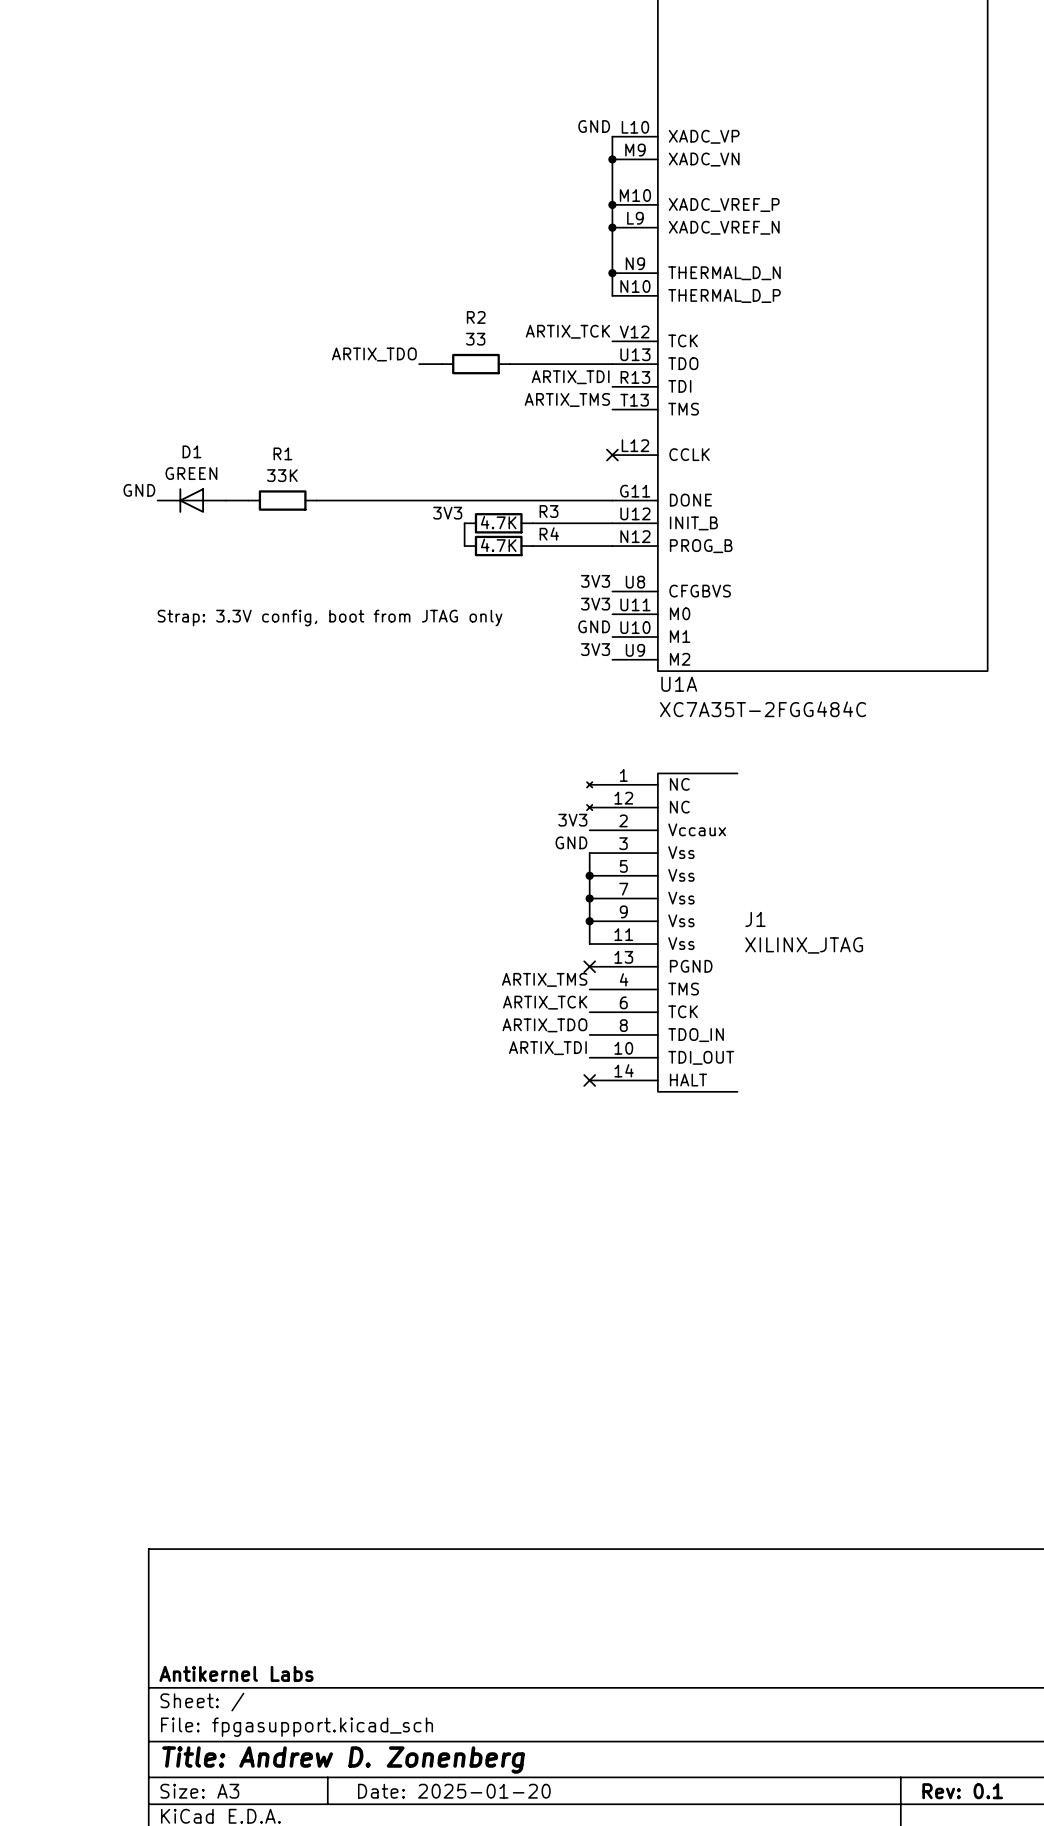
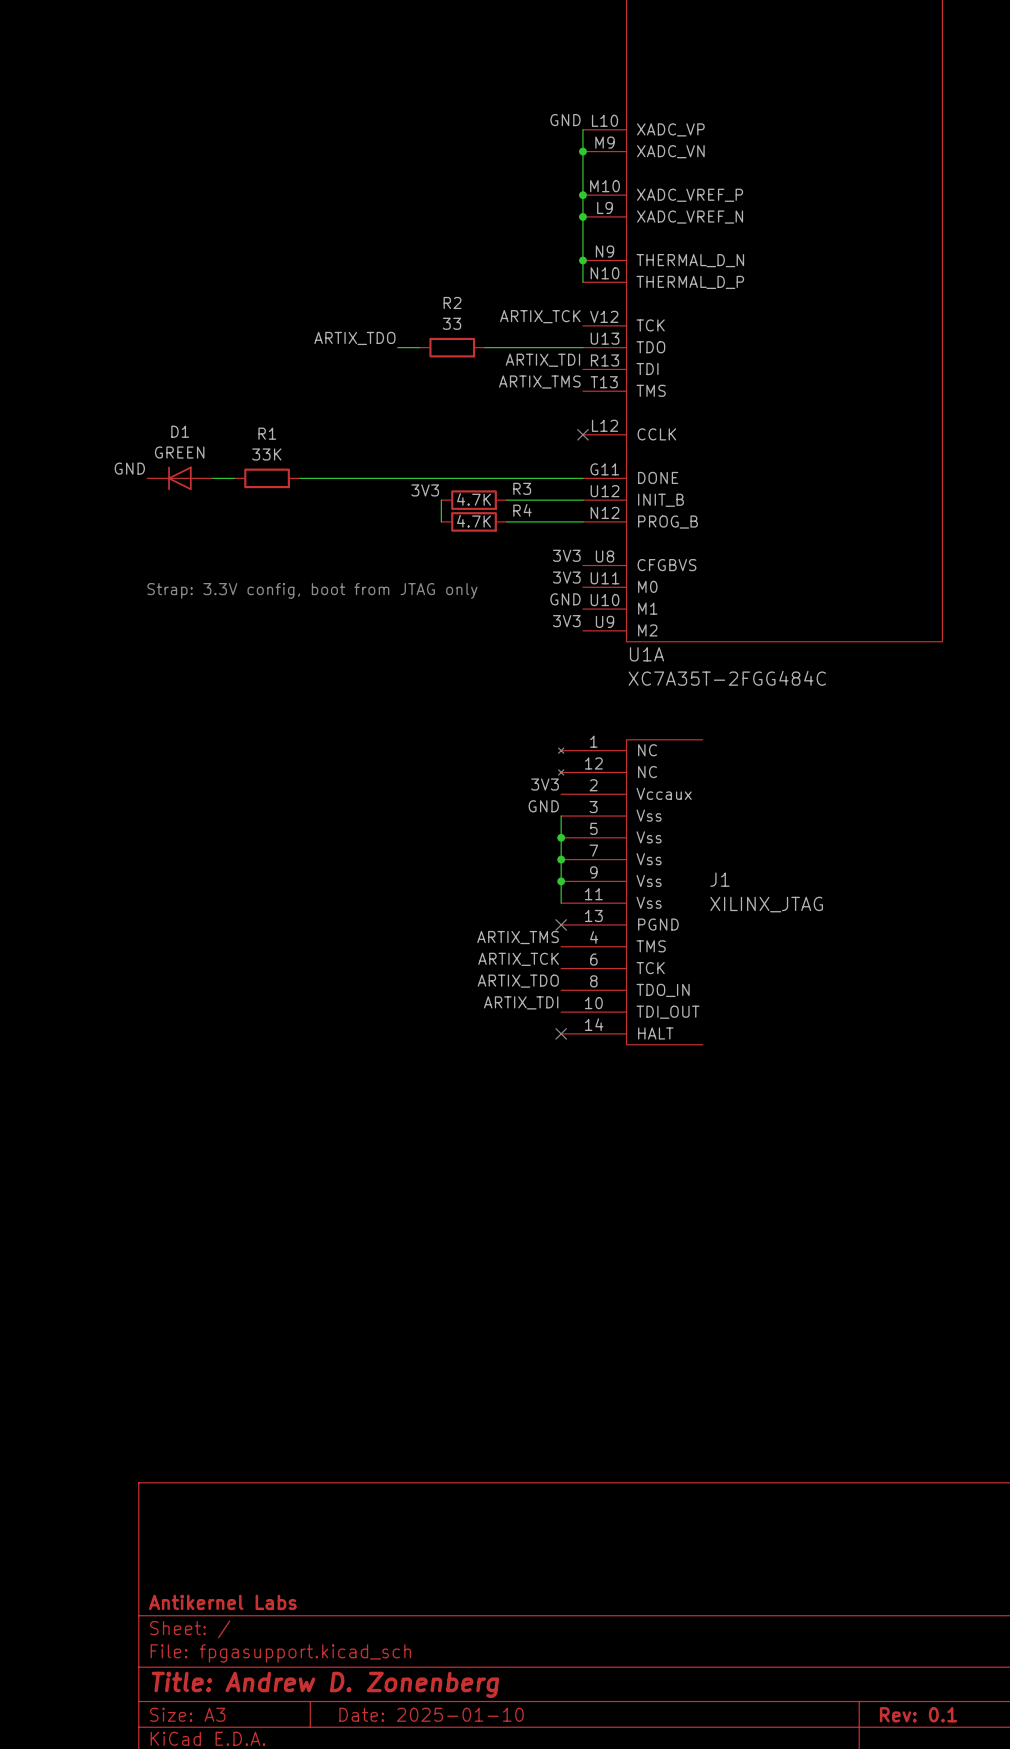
title block: Date: 2025-01-20 (454, 1791) -> Date: 2025-01-10 (431, 1714)

